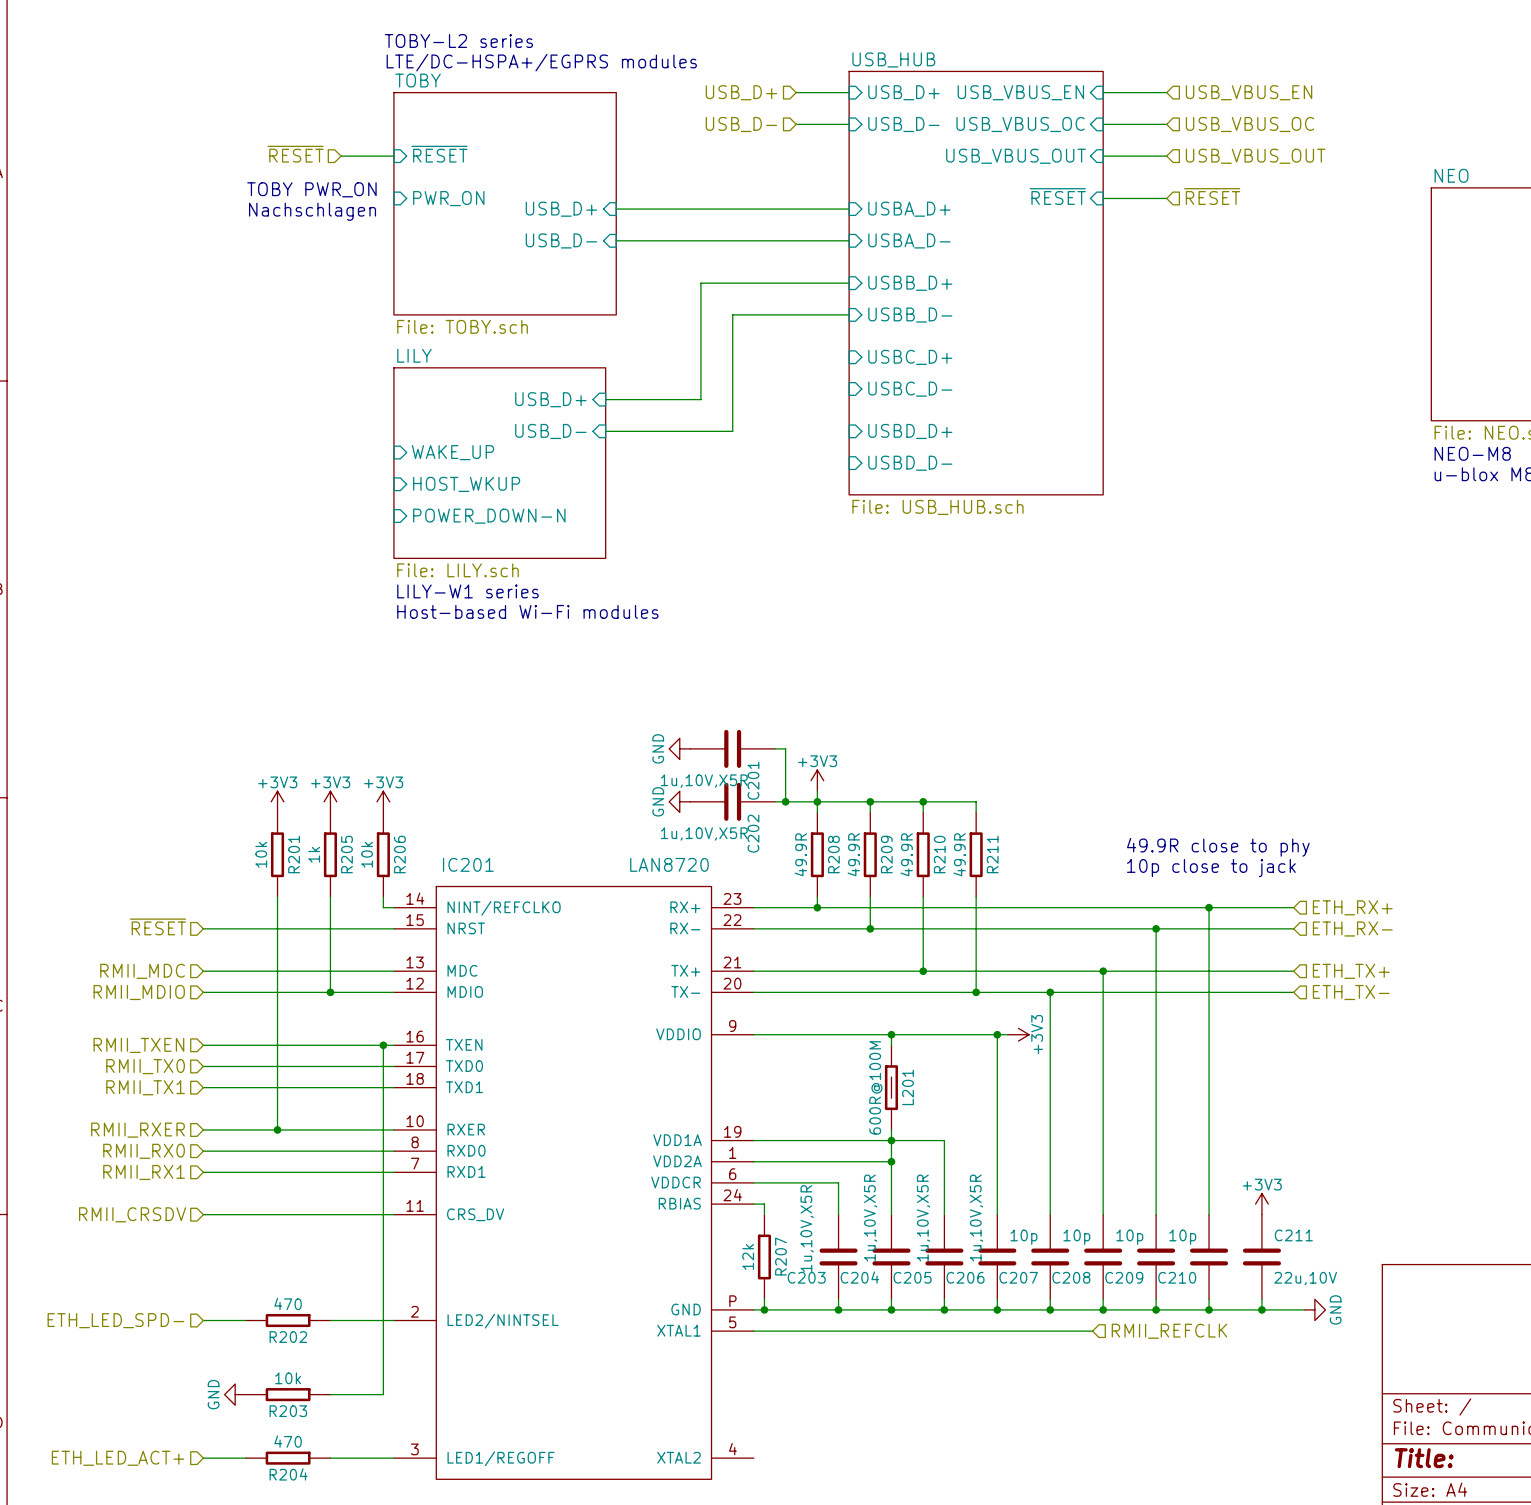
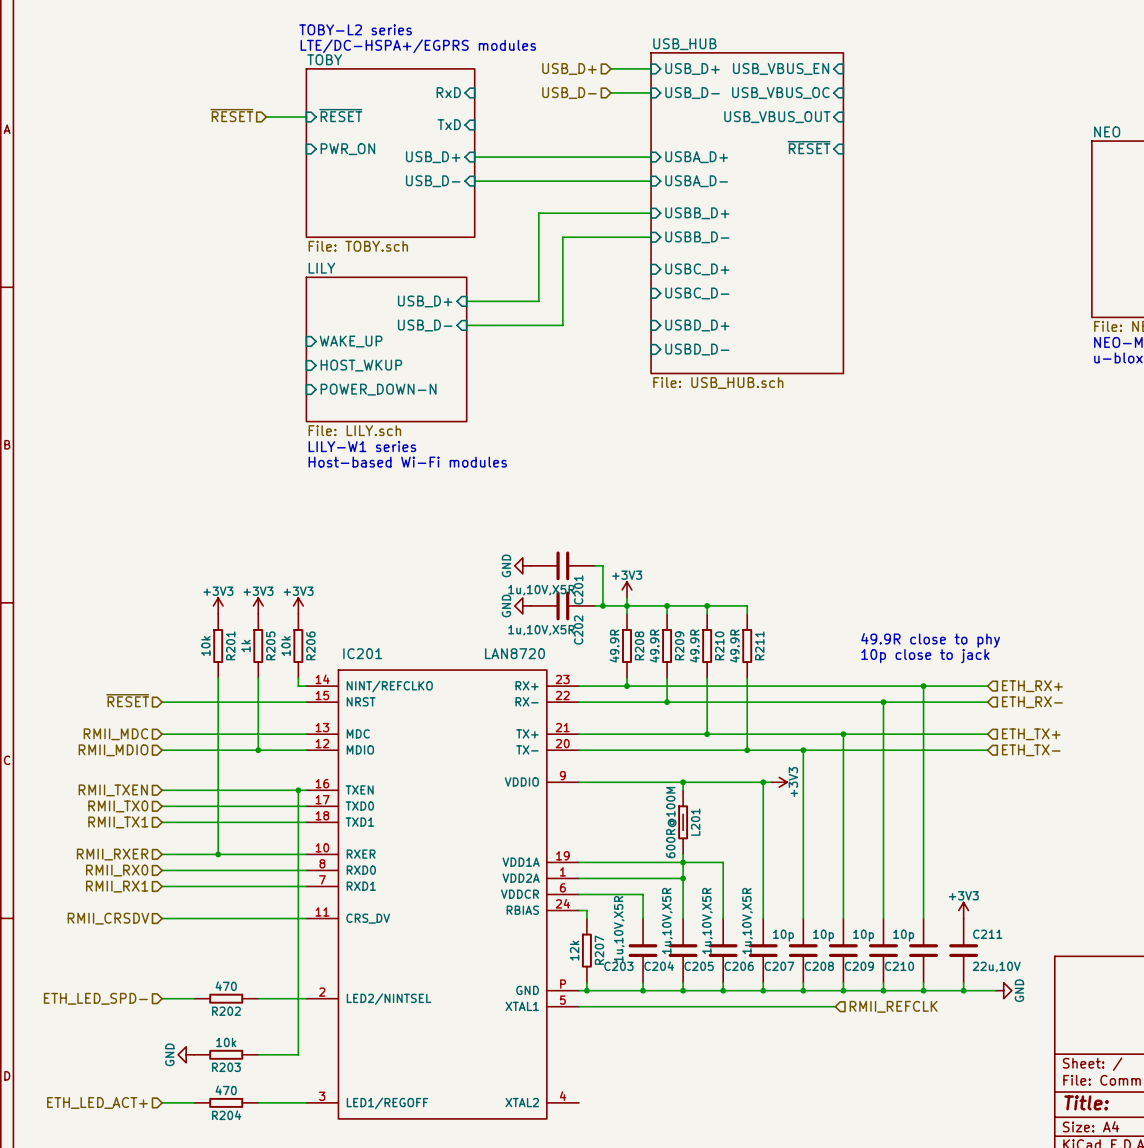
wire: (1103, 92) (1166, 92) -> none
hierarchical label: USB_VBUS_EN (1249, 92) -> none
sheet pin: none -> RxD (448, 92)
wire: (1103, 124) (1166, 124) -> none
hierarchical label: USB_VBUS_OC (1249, 124) -> none
wire: (1103, 156) (1166, 156) -> none
hierarchical label: USB_VBUS_OUT (1255, 156) -> none
sheet pin: none -> TxD (449, 124)
text: TOBY PWR_ON (311, 189) -> none
hierarchical label: ~{RESET} (1212, 196) -> none
wire: (1103, 198) (1166, 198) -> none
text: Nachschlagen (312, 211) -> none

